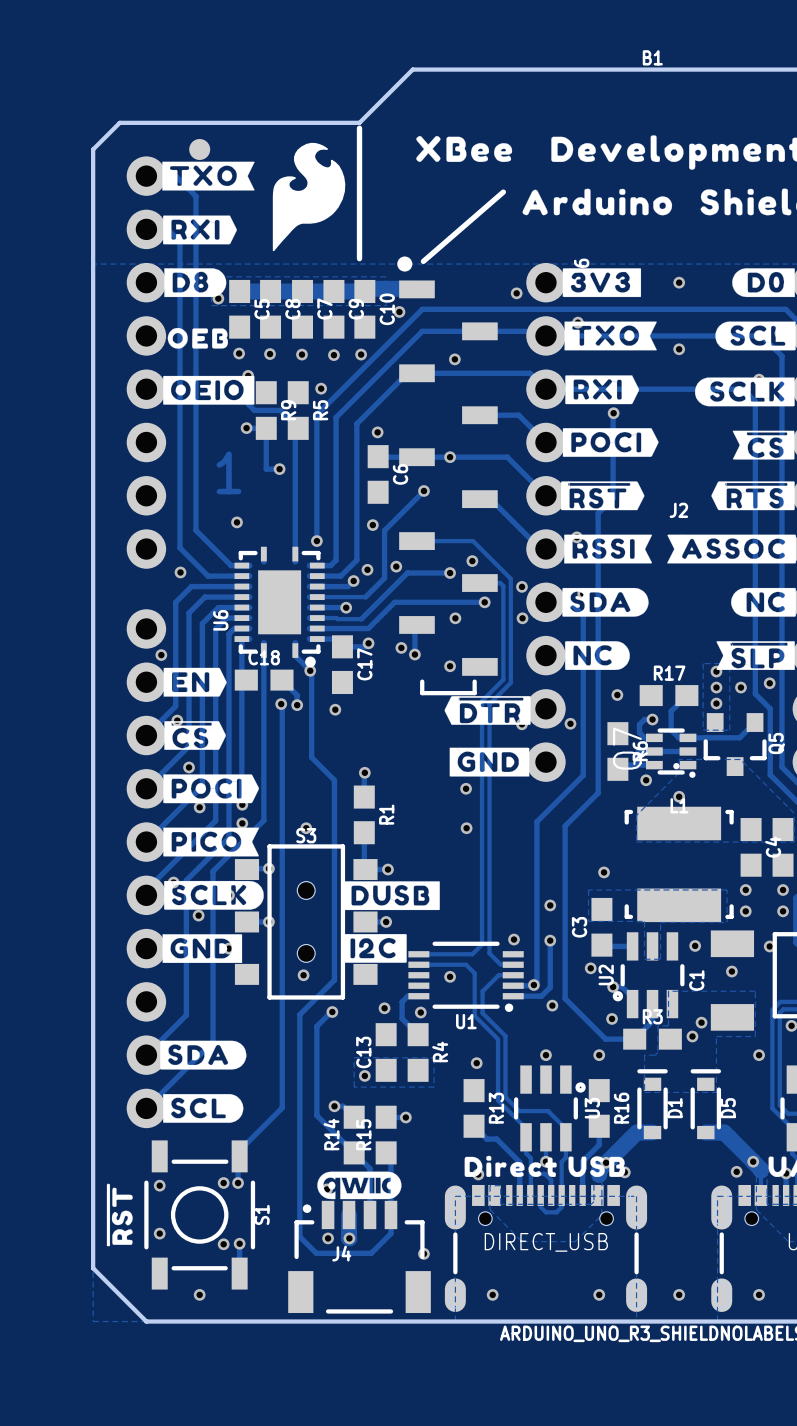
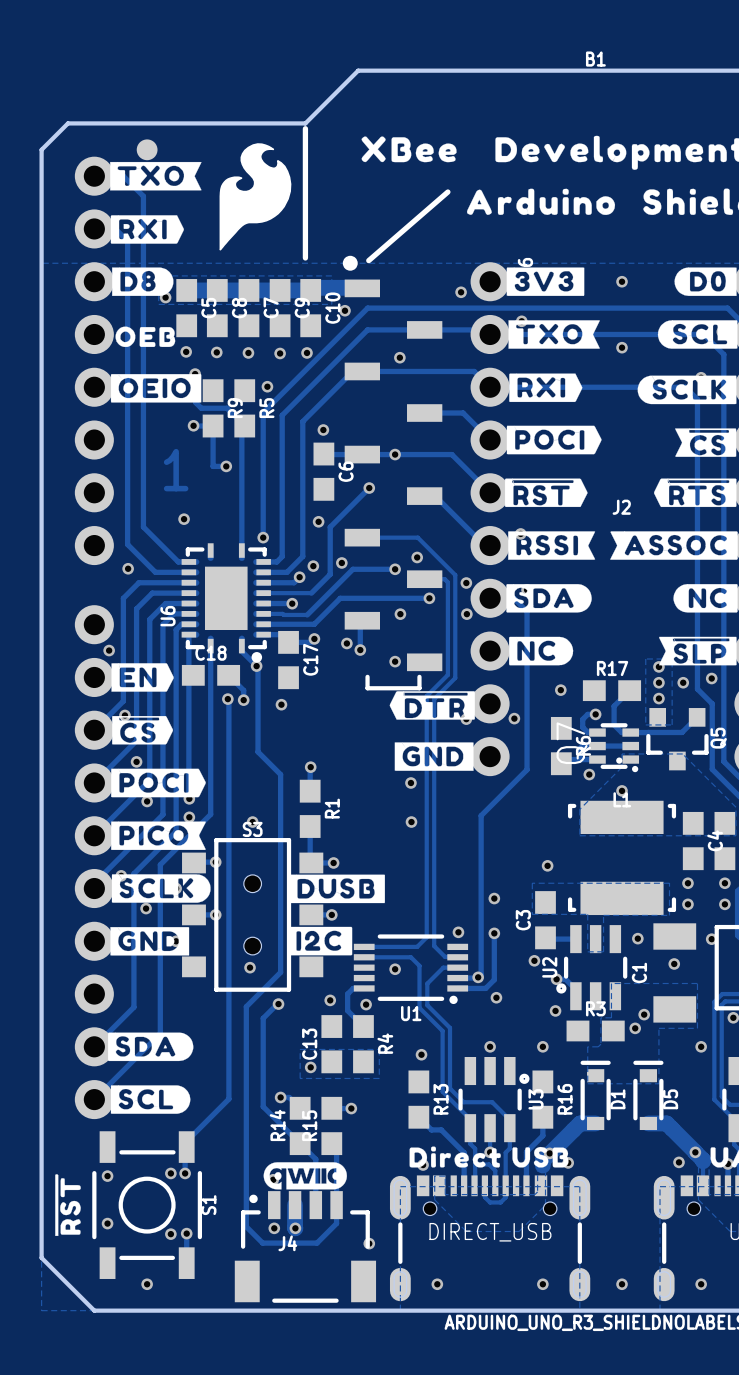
track: (613, 413) (613, 498) (598, 513) (598, 793) (565, 826) (565, 998) (605, 1039) (634, 1039) (652, 1021) (652, 1004) -> none
via: (613, 413) -> none

